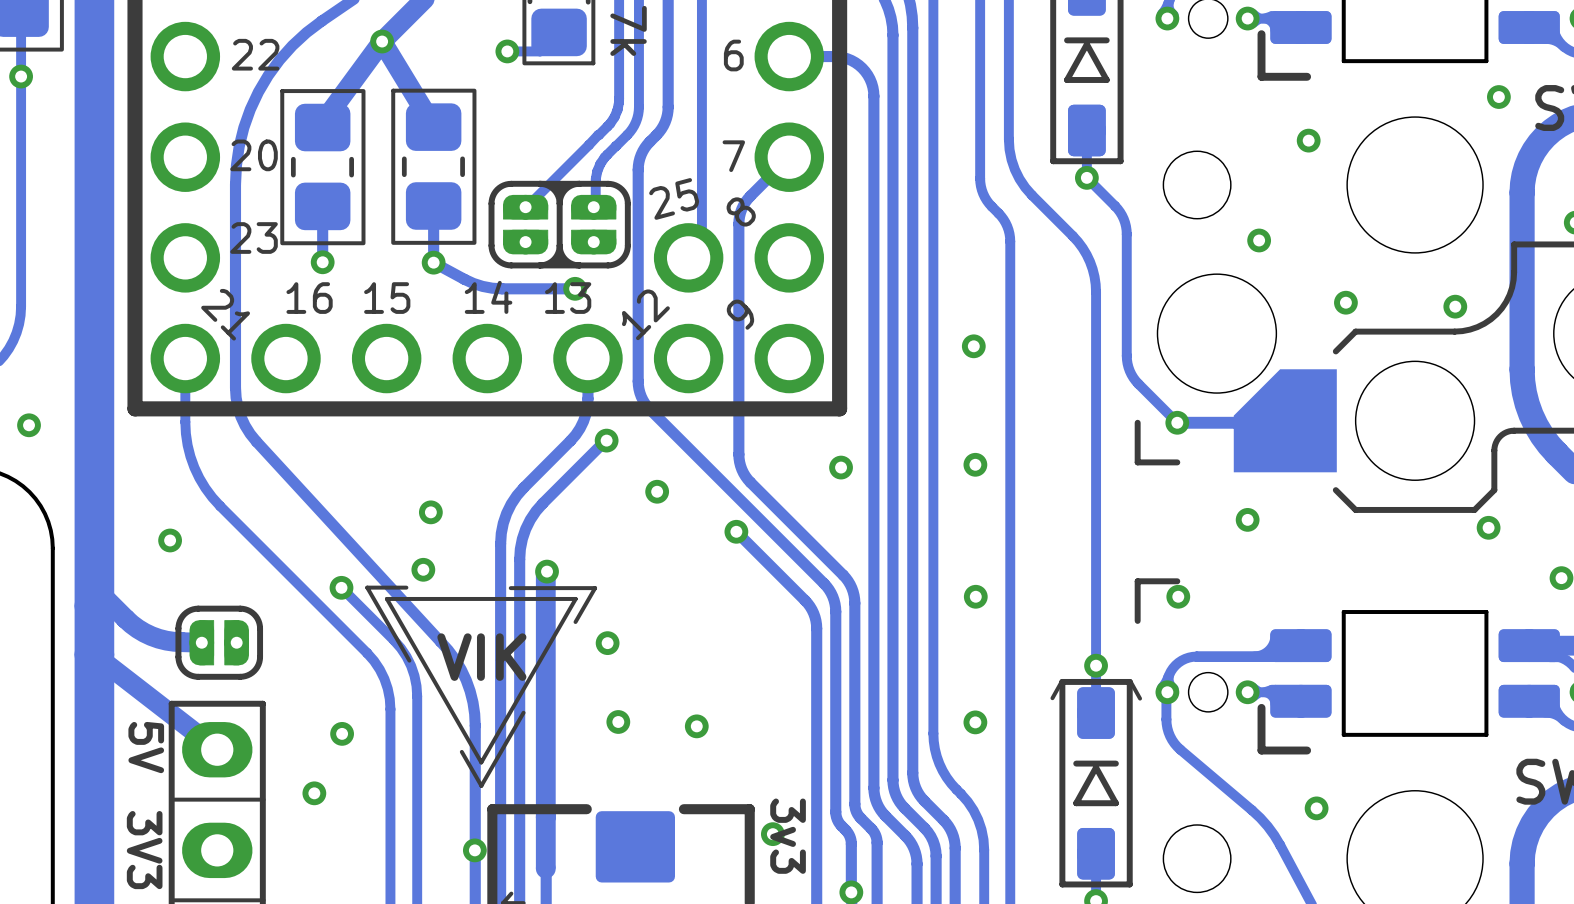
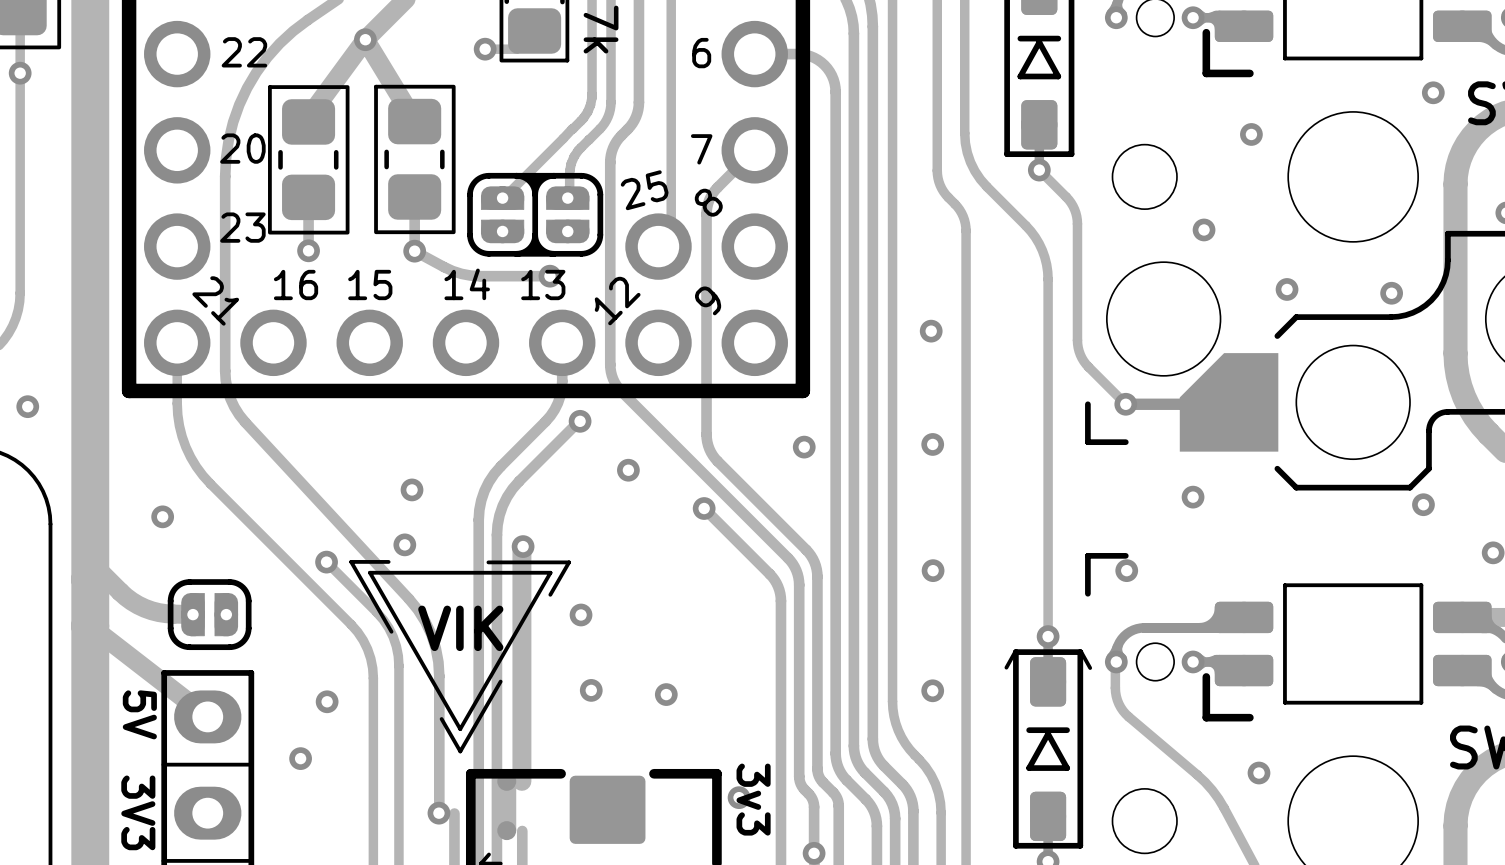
track: (256, 441) (448, 650) (461, 669) (470, 691) (474, 713) (475, 849) -> (245, 422) (408, 598) (425, 621) (431, 634) (438, 662) (439, 812)
part position: (545, 842) -> (506, 805)
via position: (474, 850) -> (438, 813)

